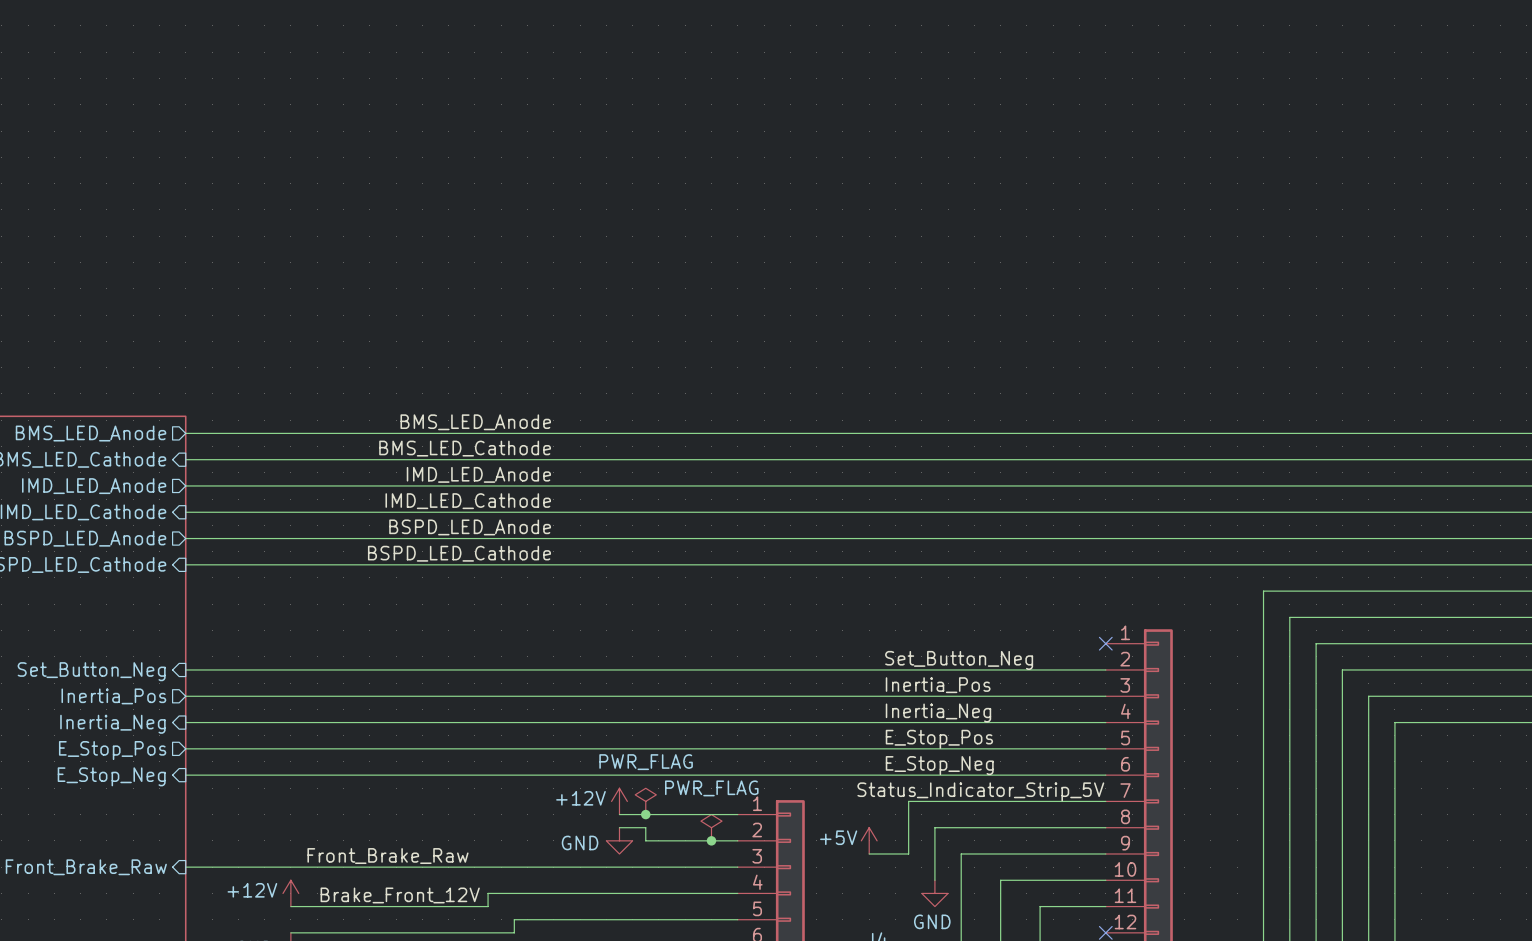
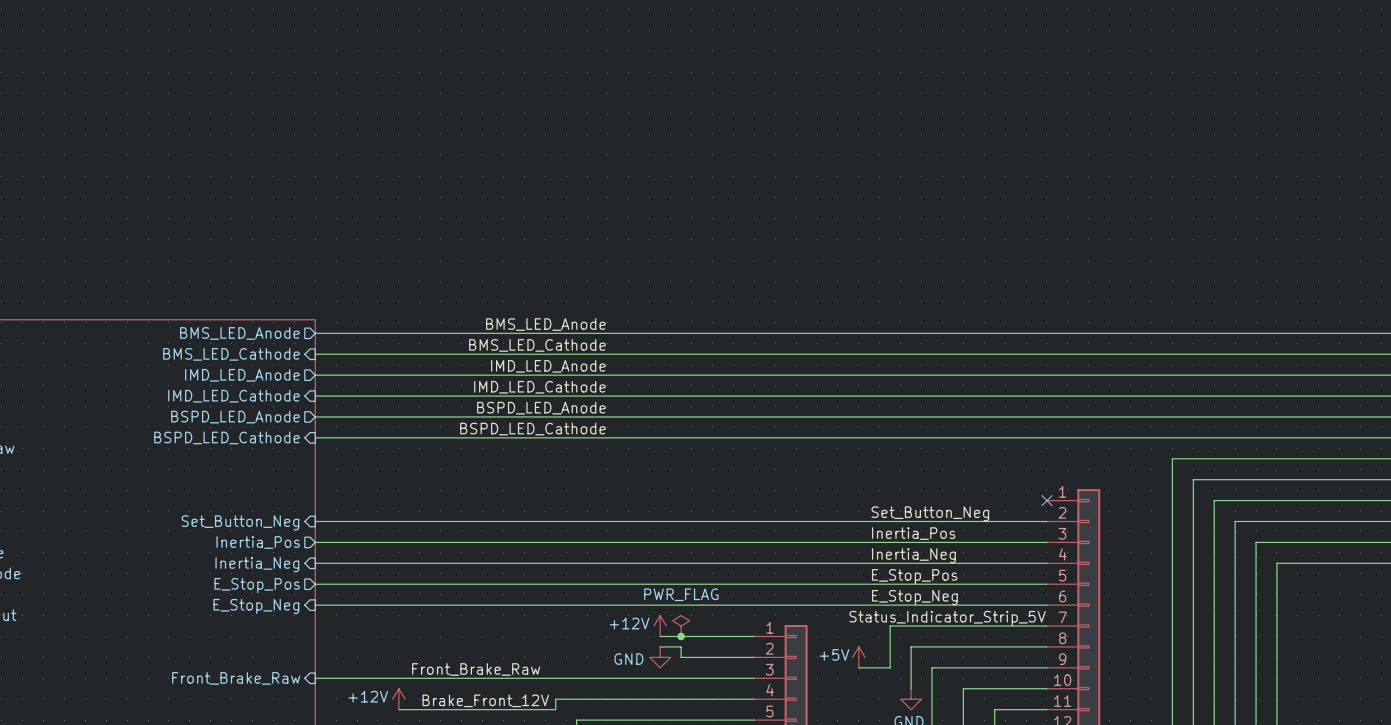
power symbol: PWR_FLAG (711, 827) -> none
junction: (711, 840) -> none

